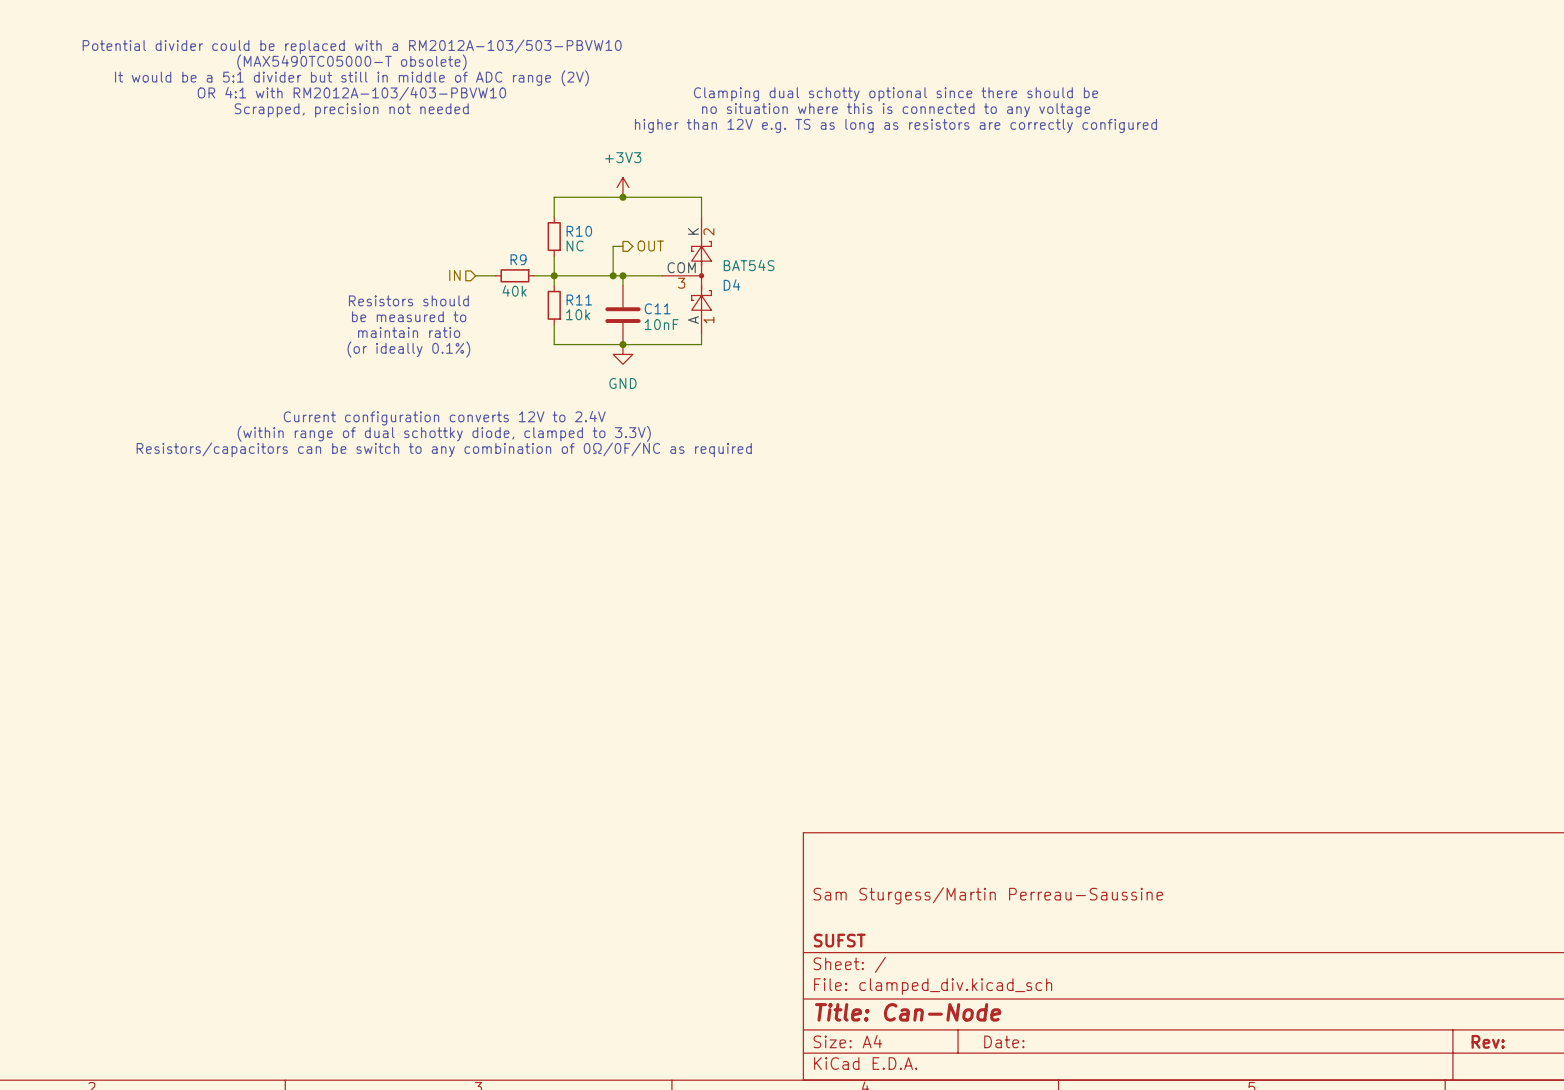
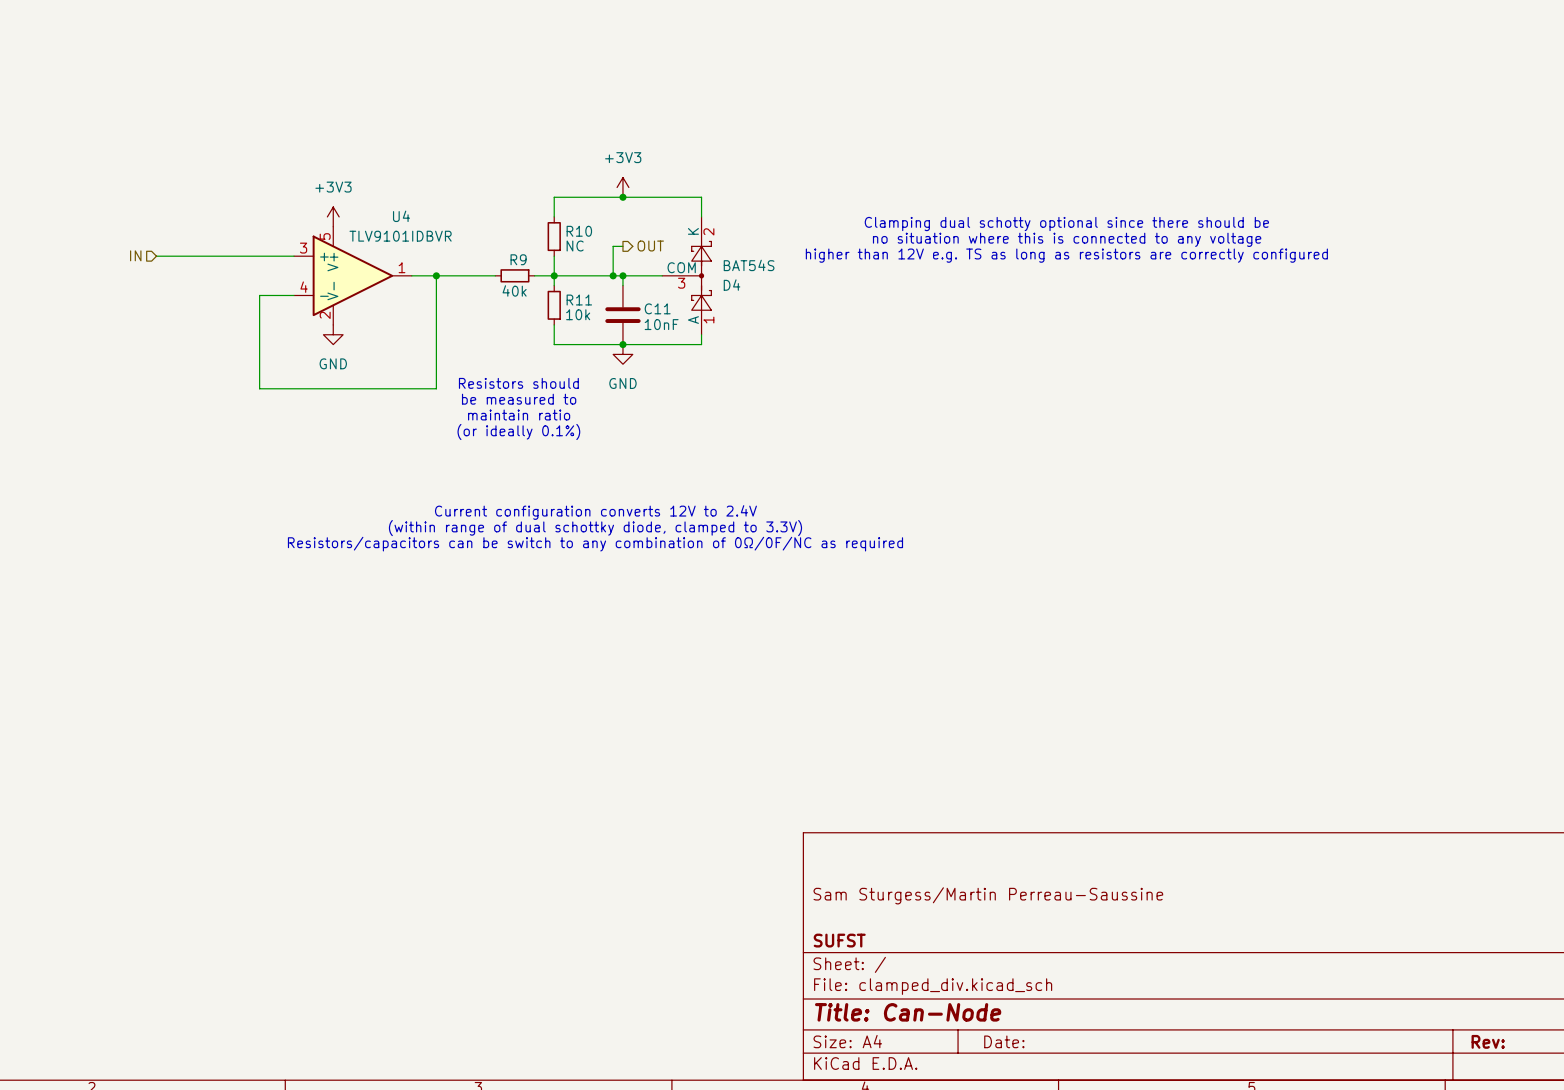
text: Potential divider could be replaced with a RM2012A-103/503-PBVW10 (352, 46) -> none
text: (MAX5490TC05000-T obsolete) (351, 62) -> none
text: It would be a 5:1 divider but still in middle of ADC range (2V) (351, 78) -> none
text: OR 4:1 with RM2012A-103/403-PBVW10 (351, 93) -> none
text: Clamping dual schotty optional since there should be (895, 94) -> none
text: Scrapped, precision not needed (351, 110) -> none
text: no situation where this is connected to any voltage (896, 110) -> none
text: higher than 12V e.g. TS as long as resistors are correctly configured (895, 126) -> none
power symbol: none -> +3V3 (333, 216)
text: none -> Clamping dual schotty optional since there should be (1066, 224)
text: none -> no situation where this is connected to any voltage (1067, 239)
hierarchical label: none -> IN (135, 255)
text: none -> higher than 12V e.g. TS as long as resistors are correctly configured (1066, 255)
wire: none -> (156, 256) (293, 256)
U4: none -> TLV9101IDBVR (352, 275)
wire: none -> (411, 275) (475, 275)
wire: none -> (436, 275) (436, 388) (259, 388) (259, 295) (293, 295)
junction: none -> (436, 275)
hierarchical label: IN (454, 275) -> none
text position: Resistors should (408, 300) -> Resistors should (518, 383)
text position: be measured to (409, 316) -> be measured to (519, 399)
text position: maintain ratio (409, 332) -> maintain ratio (519, 415)
power symbol: none -> GND (333, 334)
text position: (or ideally 0.1%) (408, 349) -> (or ideally 0.1%) (518, 431)
text position: Current configuration converts 12V to 2.4V (444, 418) -> Current configuration converts 12V to 2.4V (595, 512)
text position: (within range of dual schottky diode, clamped to 3.3V) (444, 433) -> (within range of dual schottky diode, clamped to 3.3V) (595, 528)
text position: Resistors/capacitors can be switch to any combination of 0Ω/0F/NC as required (444, 449) -> Resistors/capacitors can be switch to any combination of 0Ω/0F/NC as required (595, 544)

